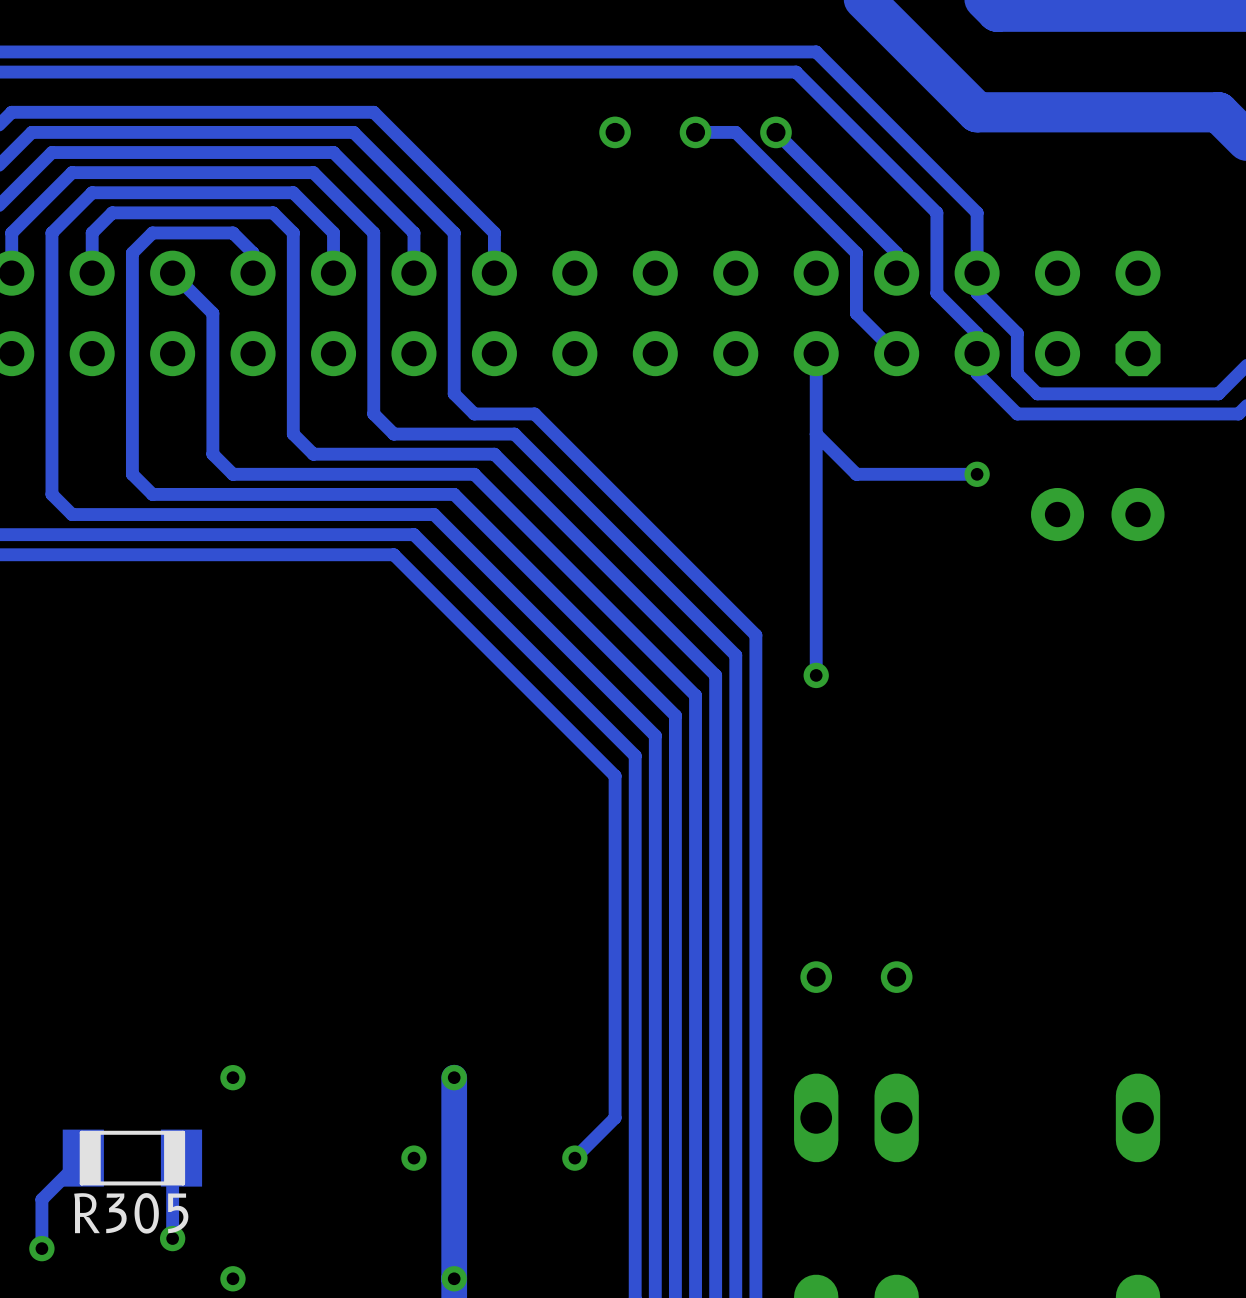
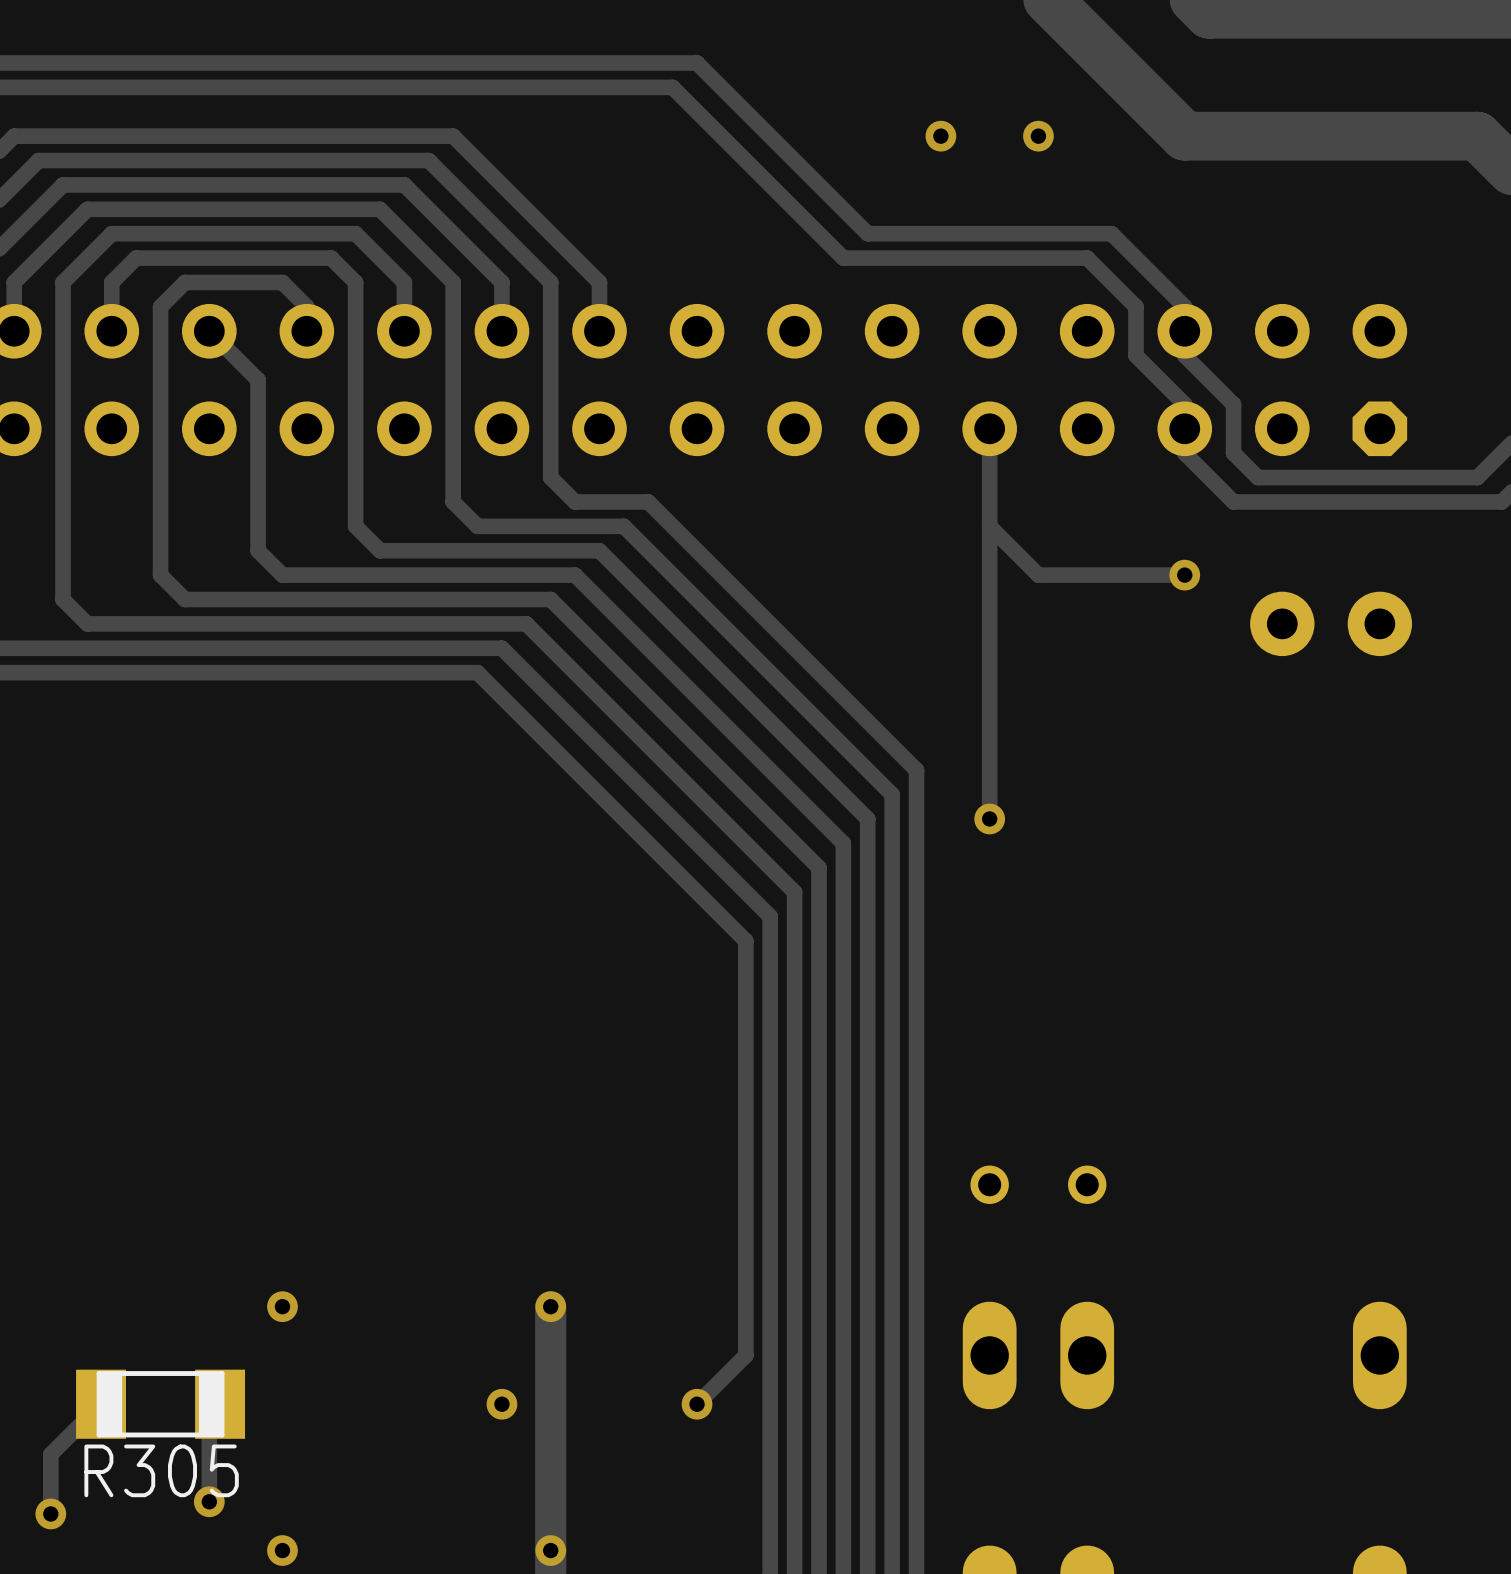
track: (574, 51) (816, 51) (977, 212) (977, 253) -> none
track: (554, 72) (796, 72) (916, 192) -> (697, 63) (867, 233) (1111, 233)
track: none -> (672, 87) (843, 258) (1087, 258) (1135, 306)
via: none -> (940, 136)
via: none -> (1038, 136)
part: (615, 132) -> none
track: (695, 132) (735, 132) (856, 253) (856, 313) (896, 353) -> none
part: (695, 132) -> none
track: (775, 132) (896, 253) (896, 273) -> none
part: (775, 132) -> none
track: (936, 212) (936, 253) -> (1135, 258) (1184, 306)

